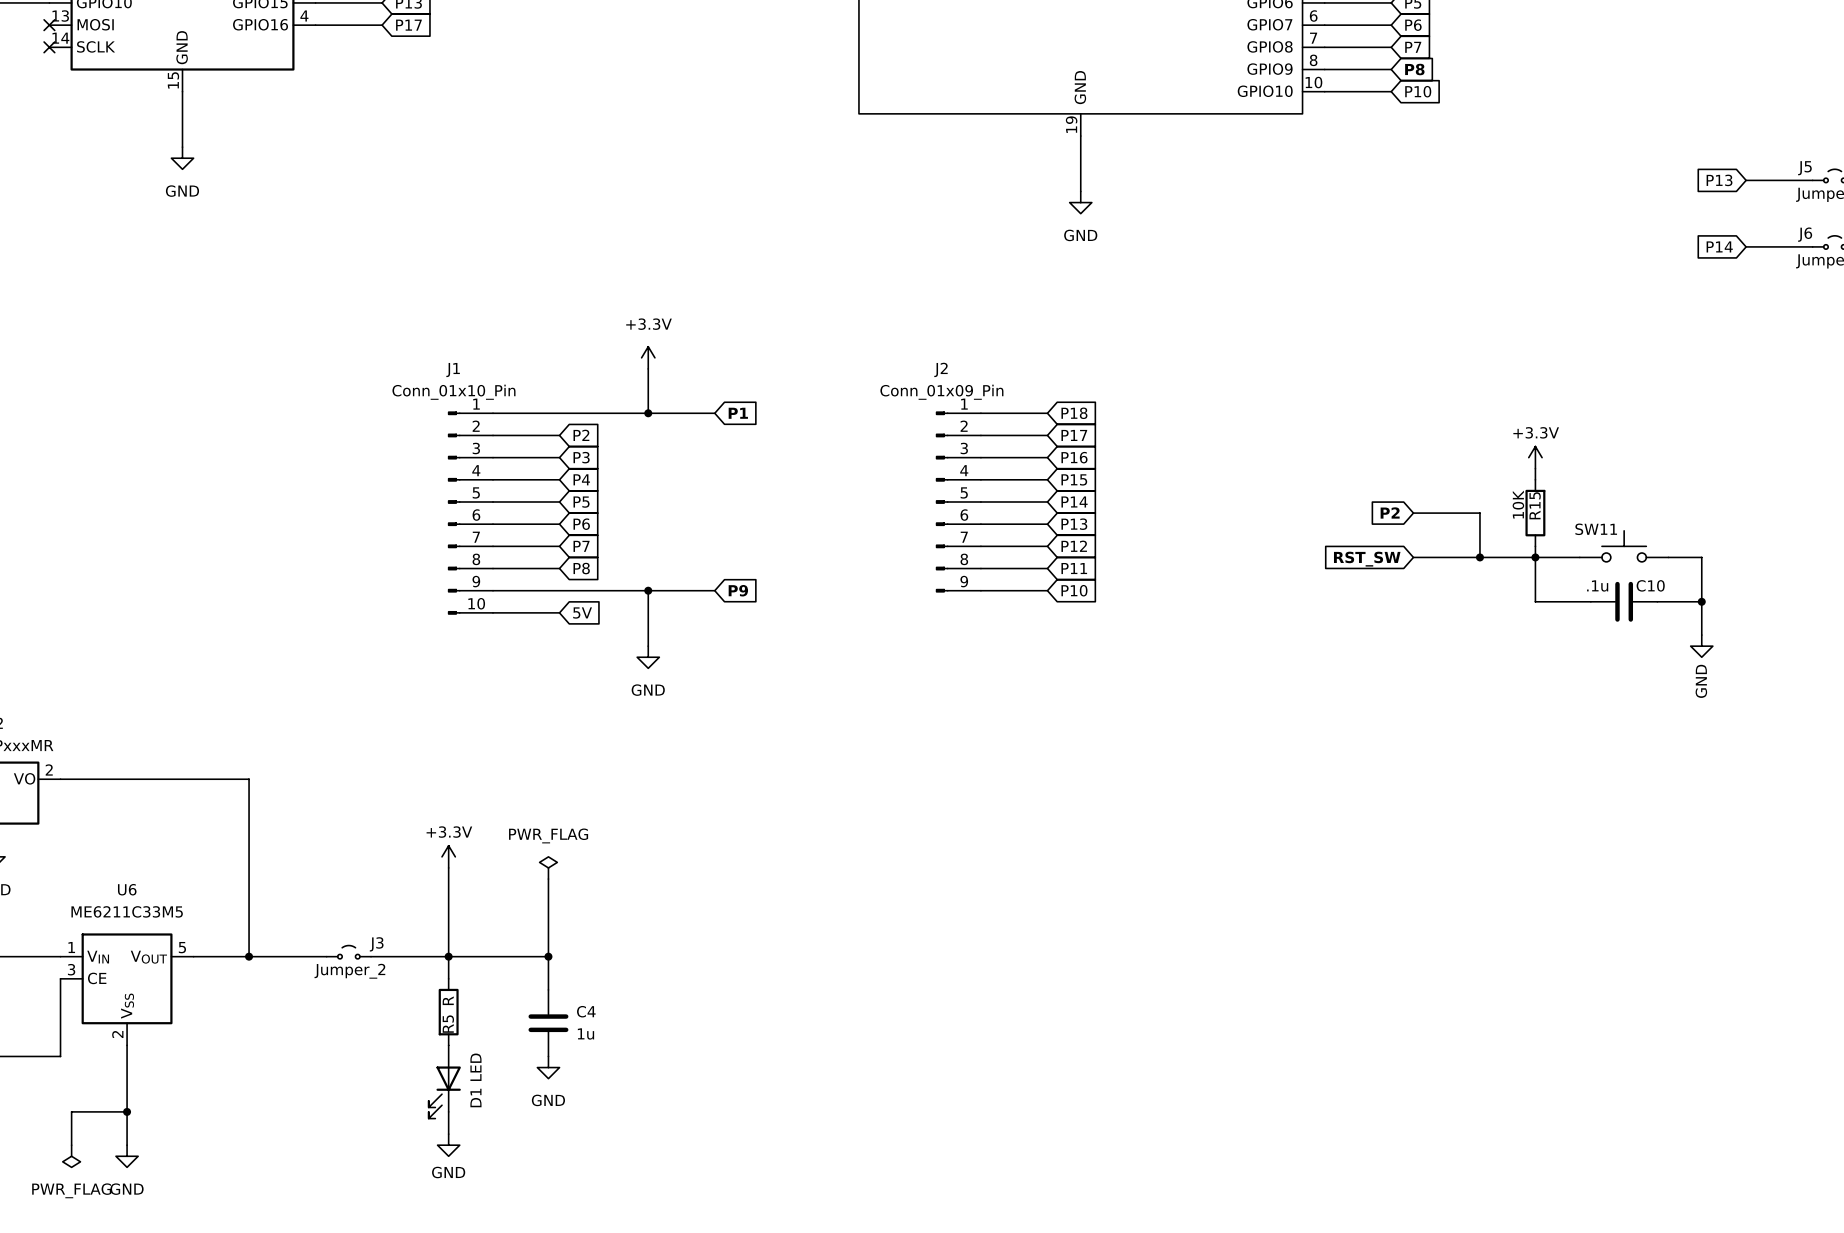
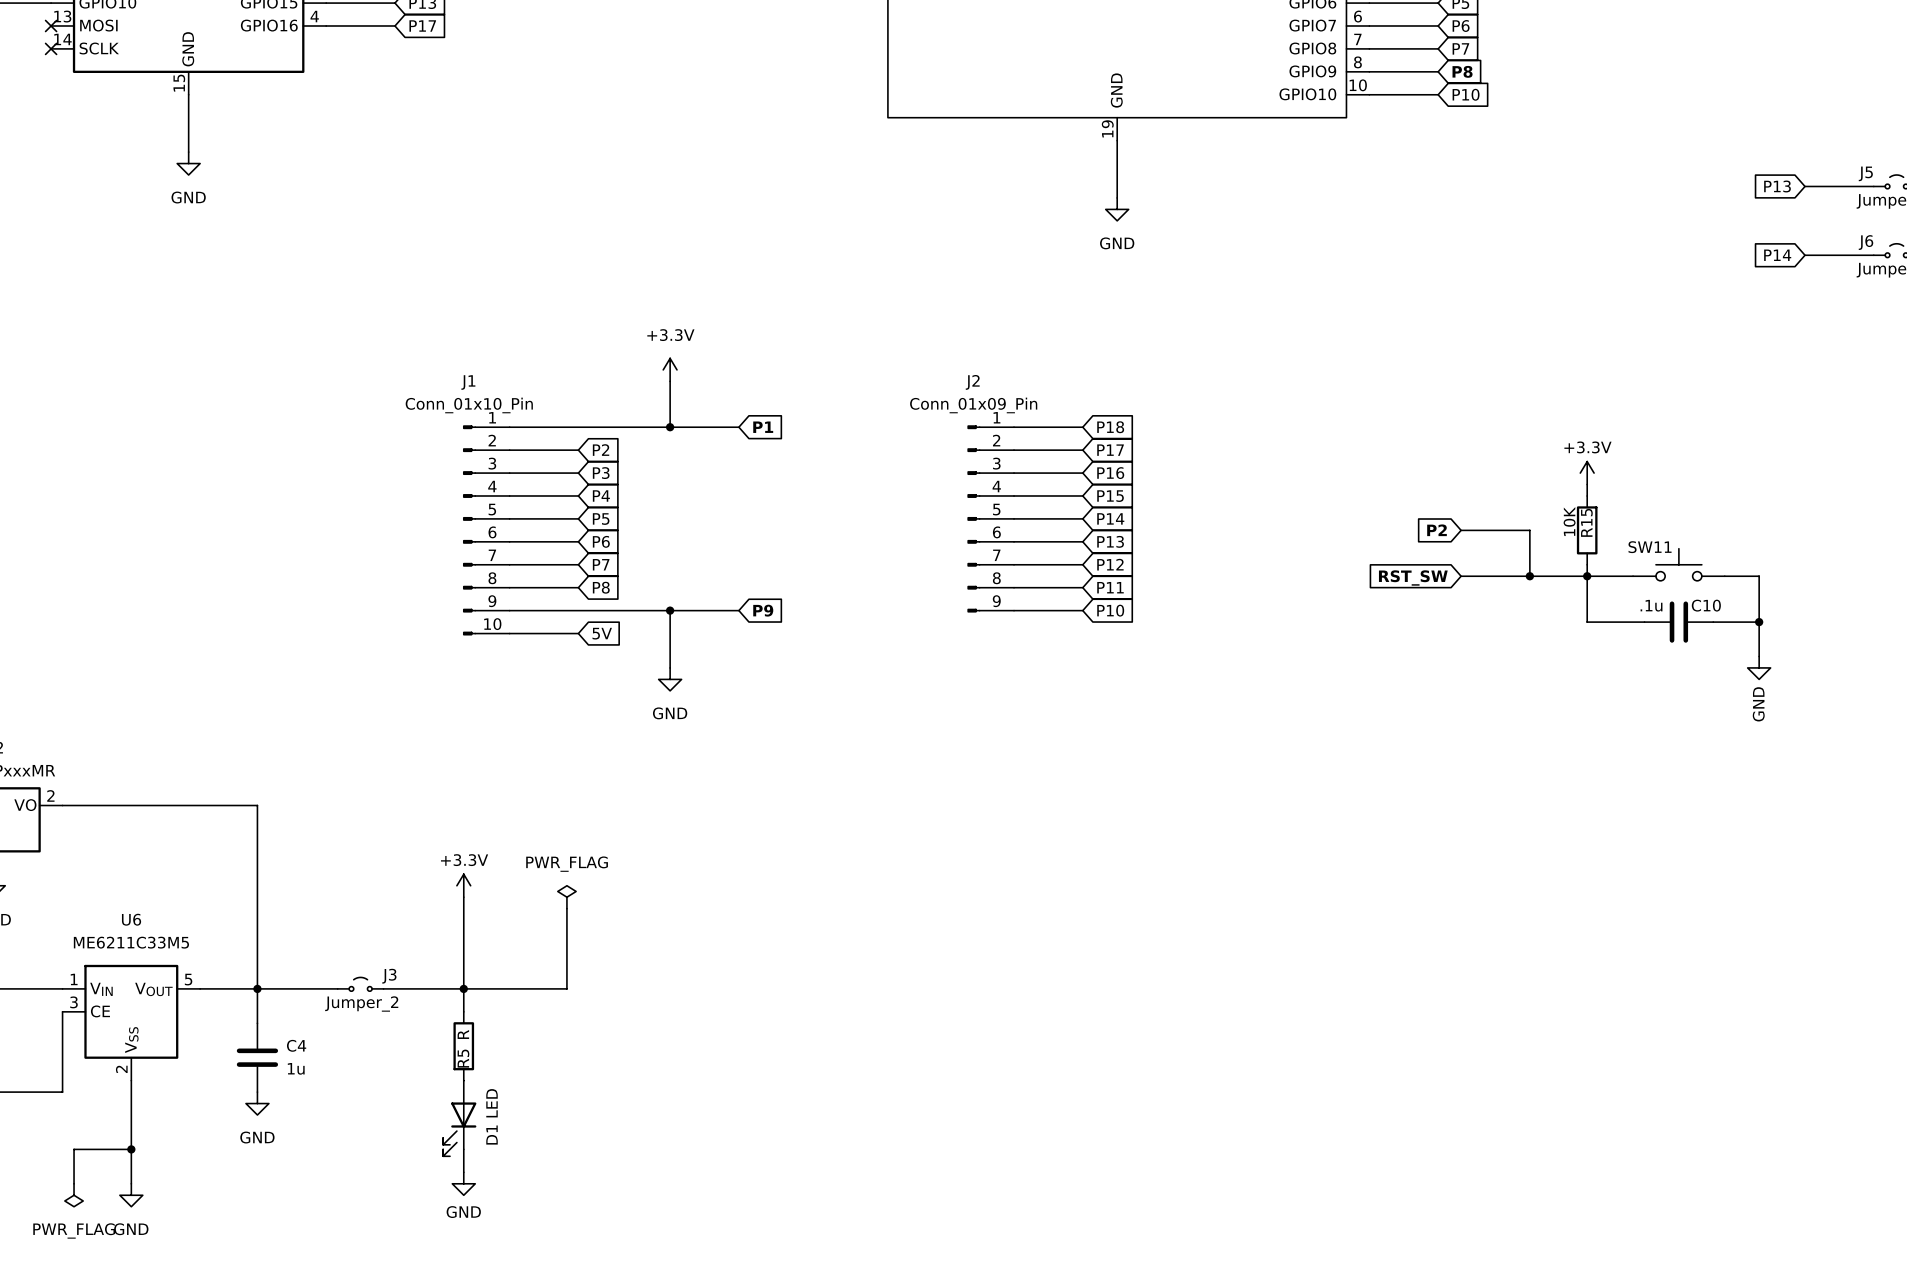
wire: none -> (257, 988) (257, 1023)
wire: (548, 956) (548, 989) -> none
junction: (548, 956) -> none
C4 position: (548, 1023) -> (257, 1057)
power symbol: none -> GND (257, 1103)
power symbol: GND (548, 1067) -> none

